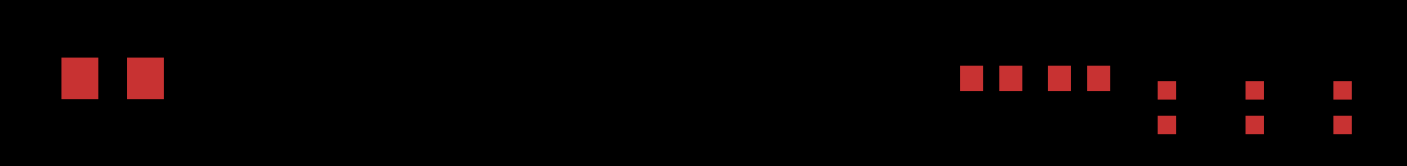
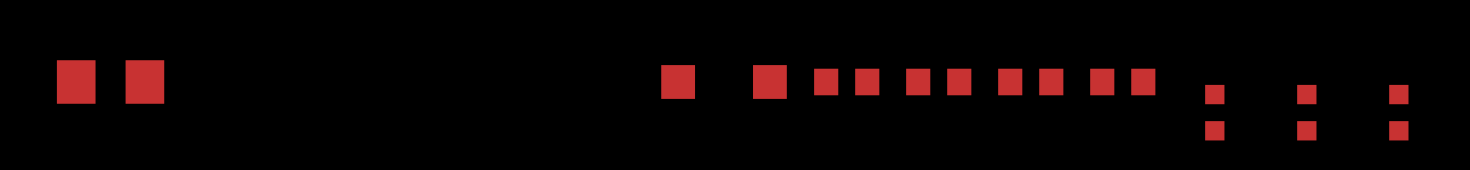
part: none -> (724, 82)
part: none -> (846, 82)
part: none -> (938, 82)

